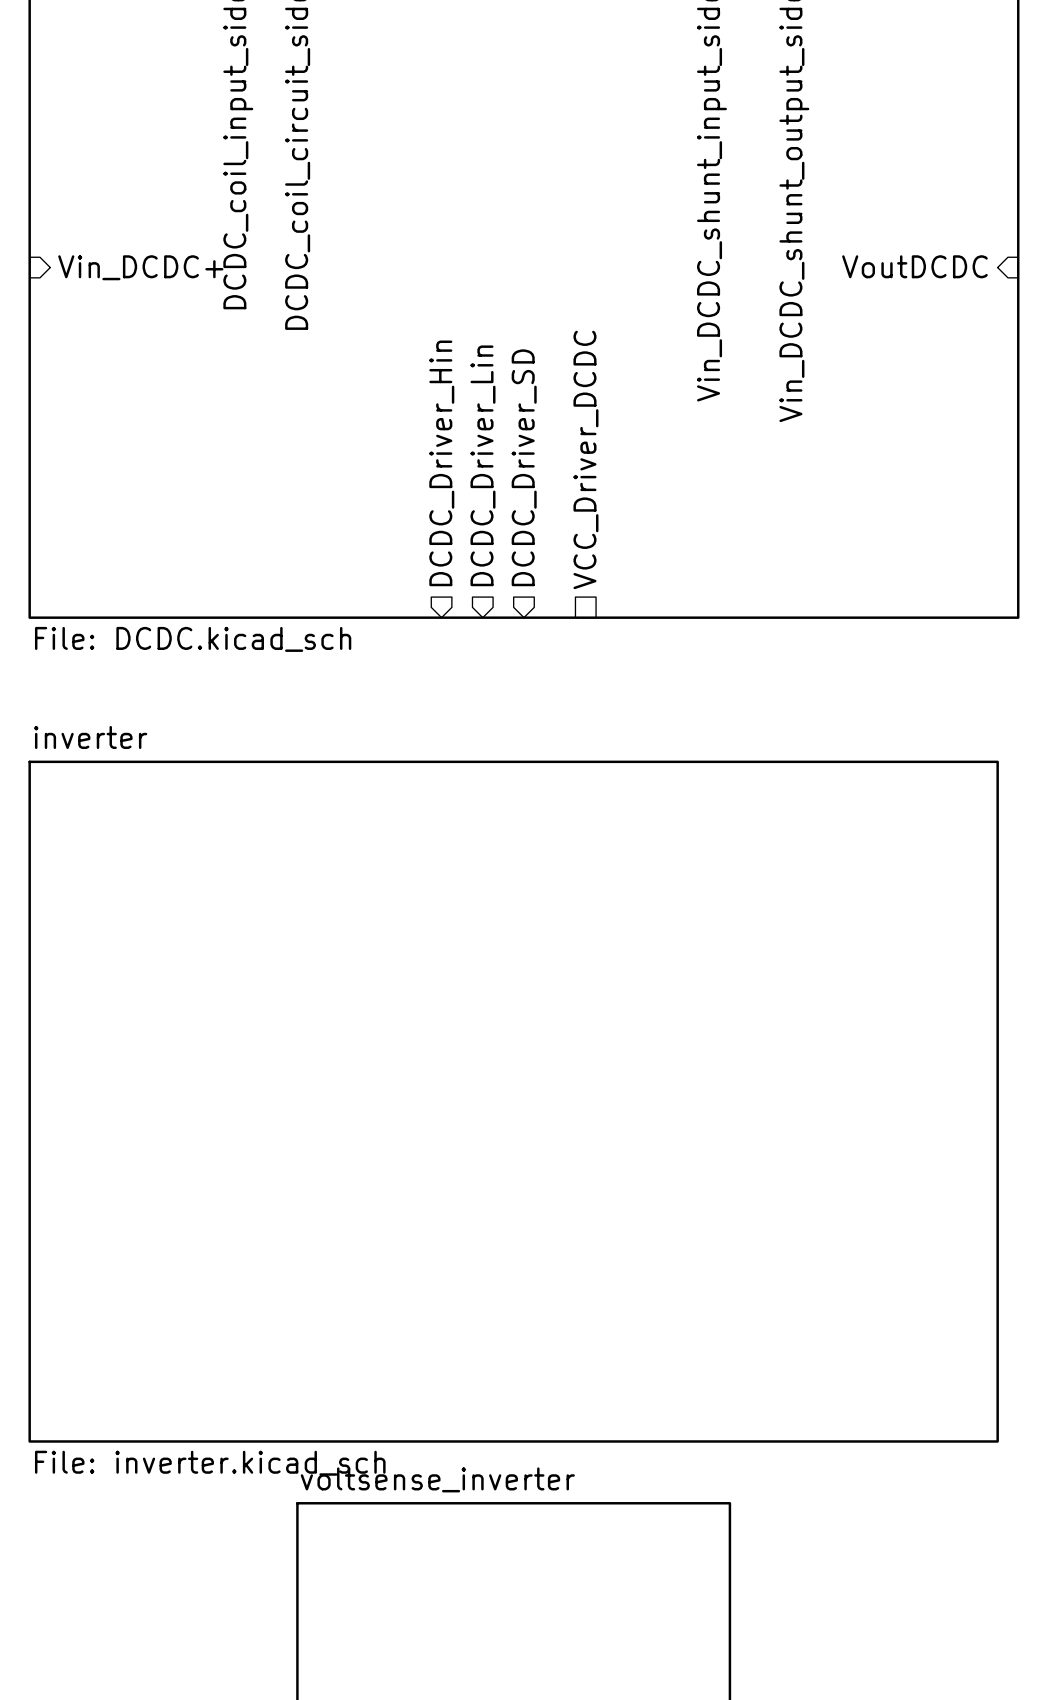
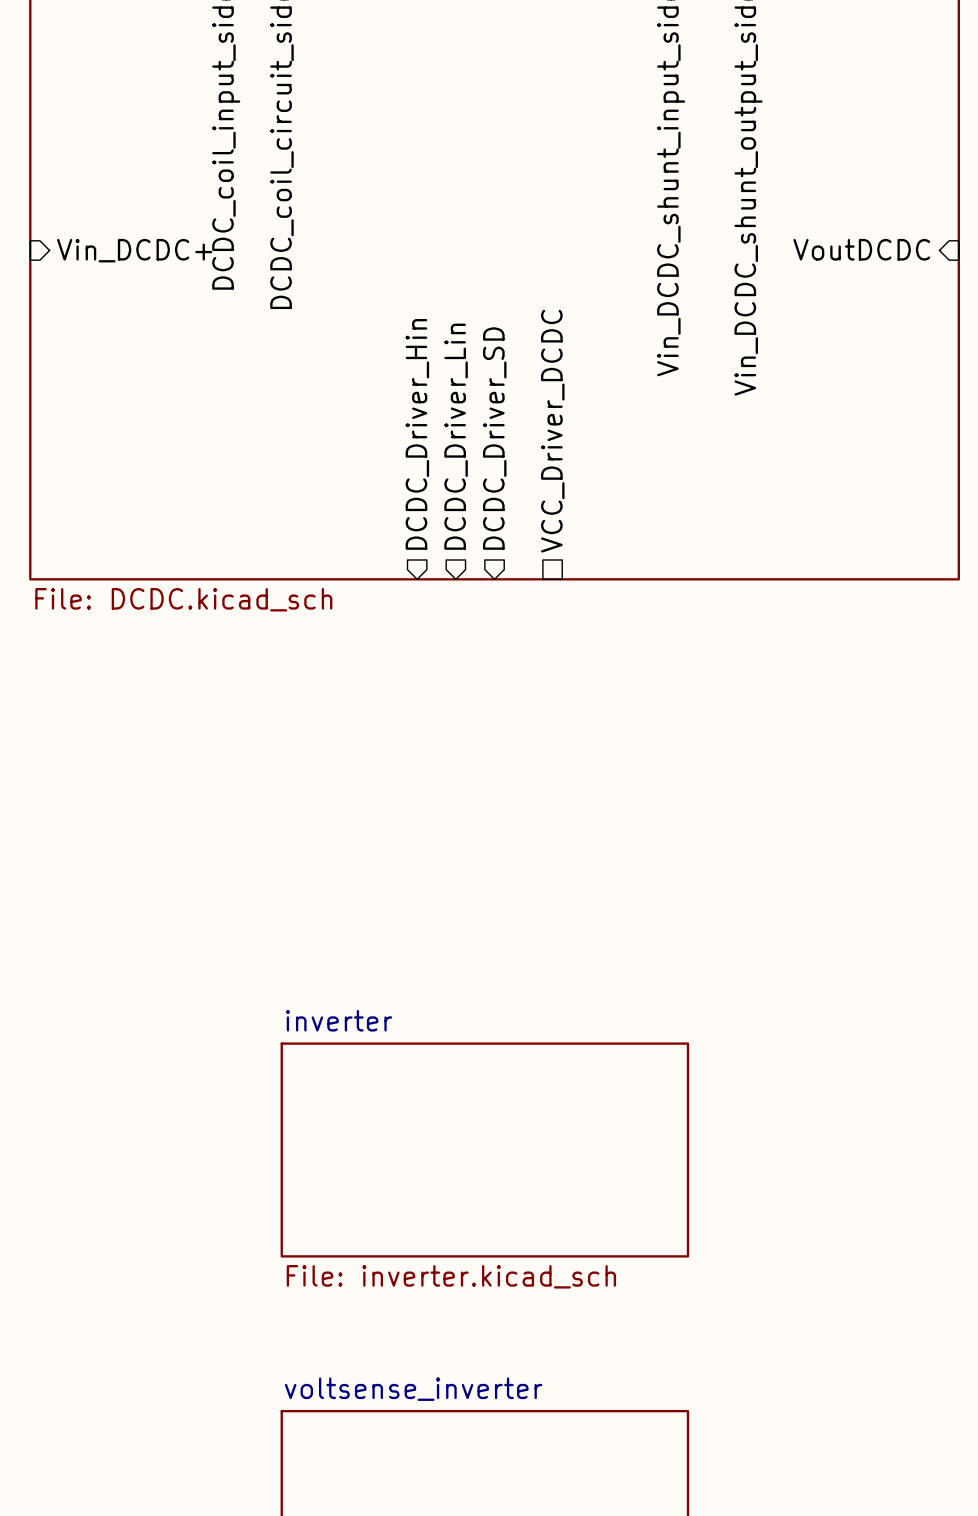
sheet inverter: File: inverter.kicad_sch (513, 1101) -> none
sheet inverter: none -> File: inverter.kicad_sch (484, 1149)

